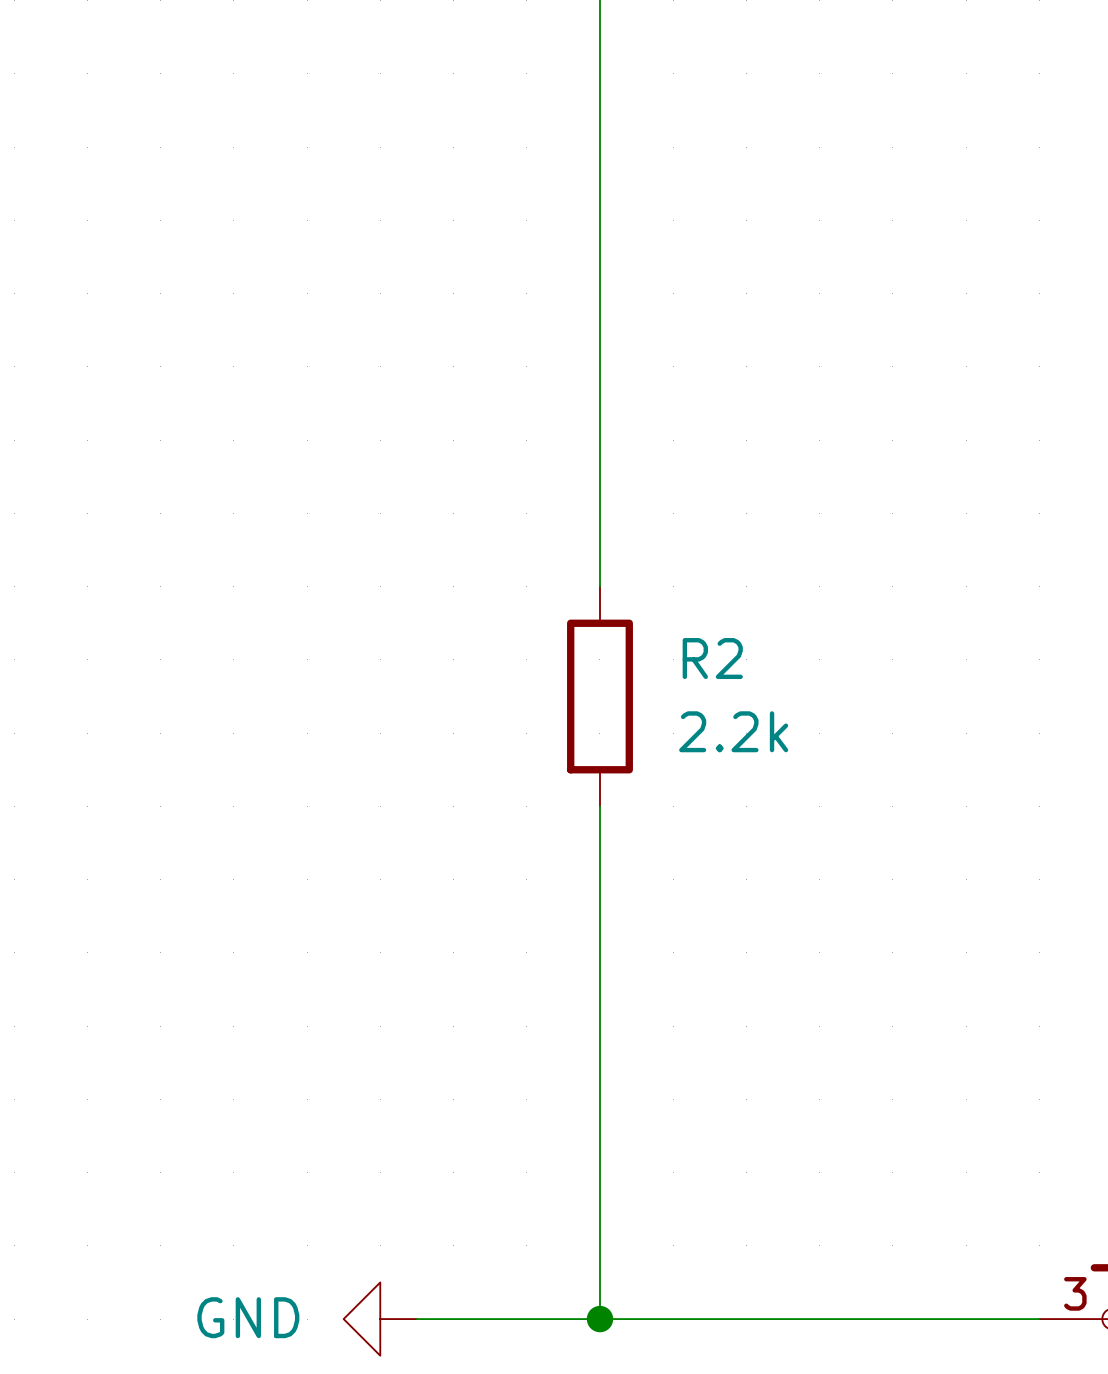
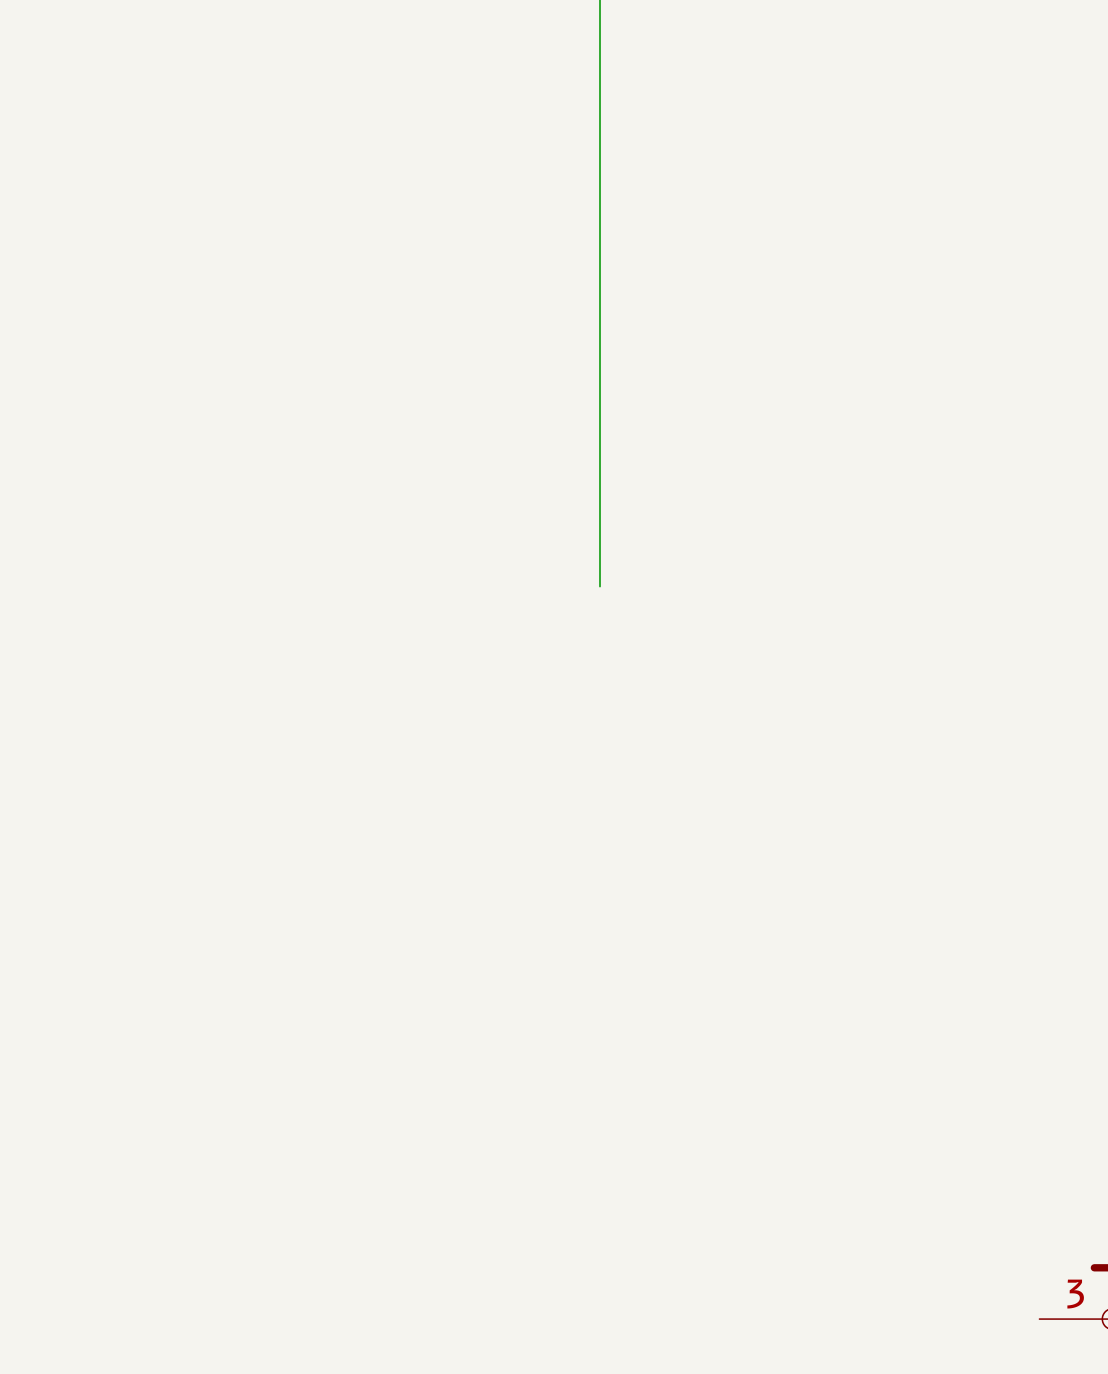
R2: 2.2k (599, 696) -> none
wire: (599, 806) (599, 1319) -> none
power symbol: GND (380, 1319) -> none
wire: (416, 1319) (1039, 1319) -> none
junction: (599, 1319) -> none

